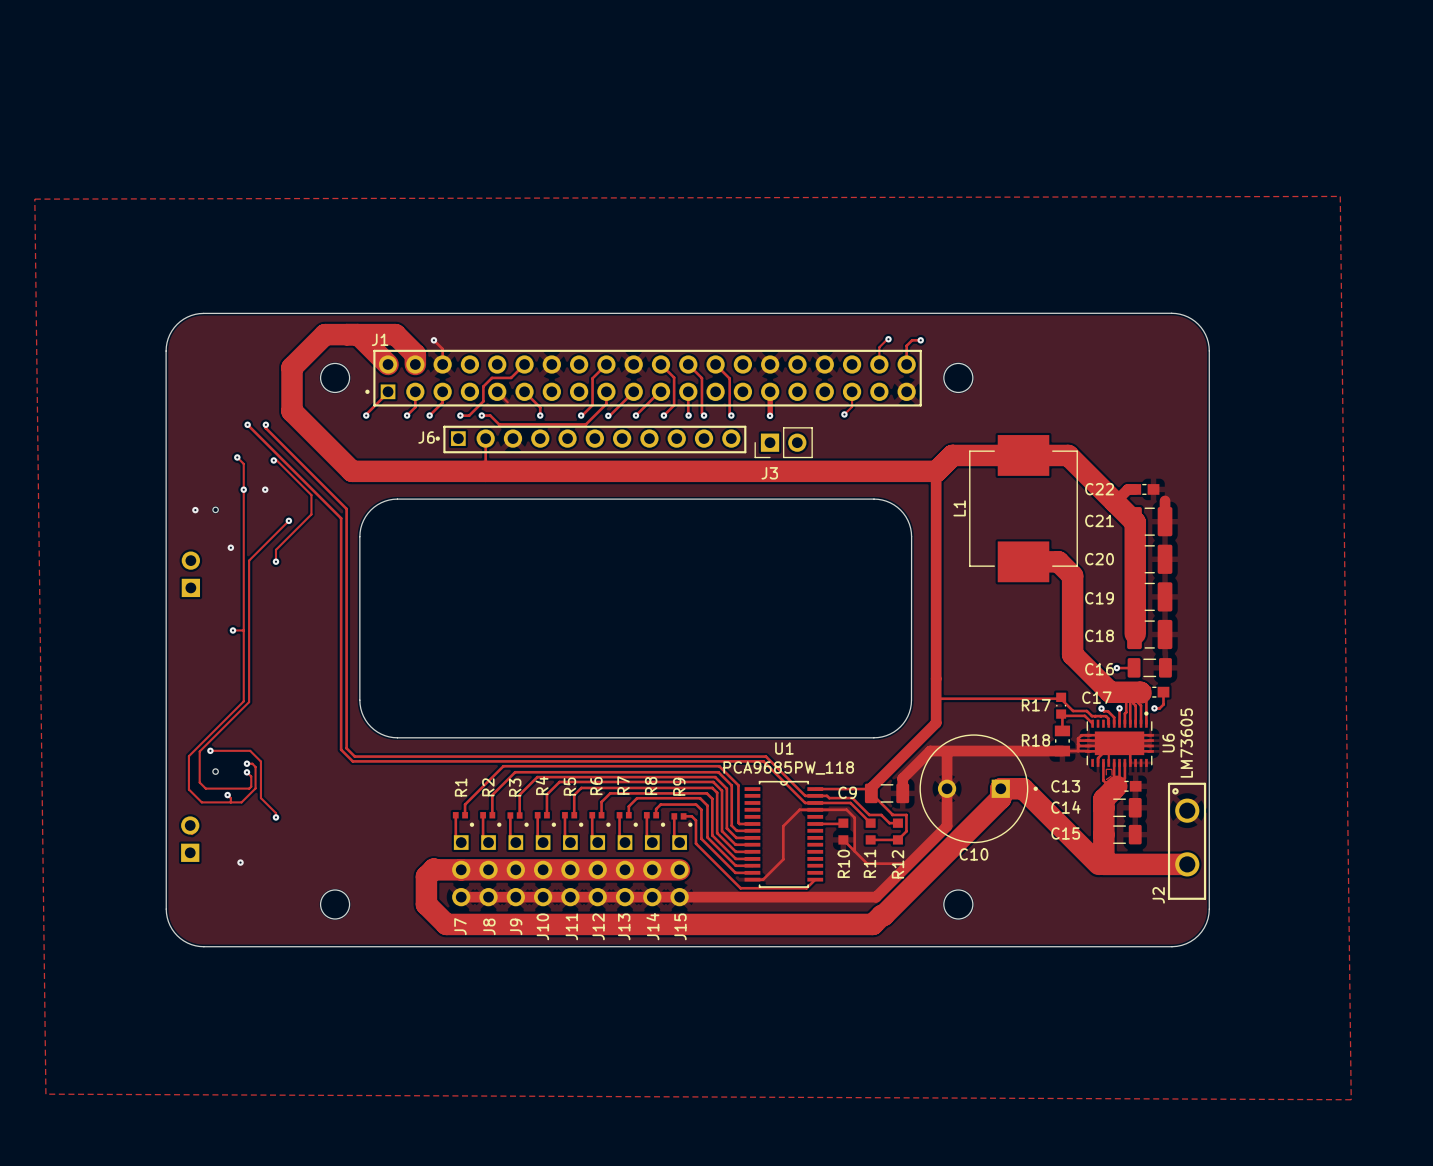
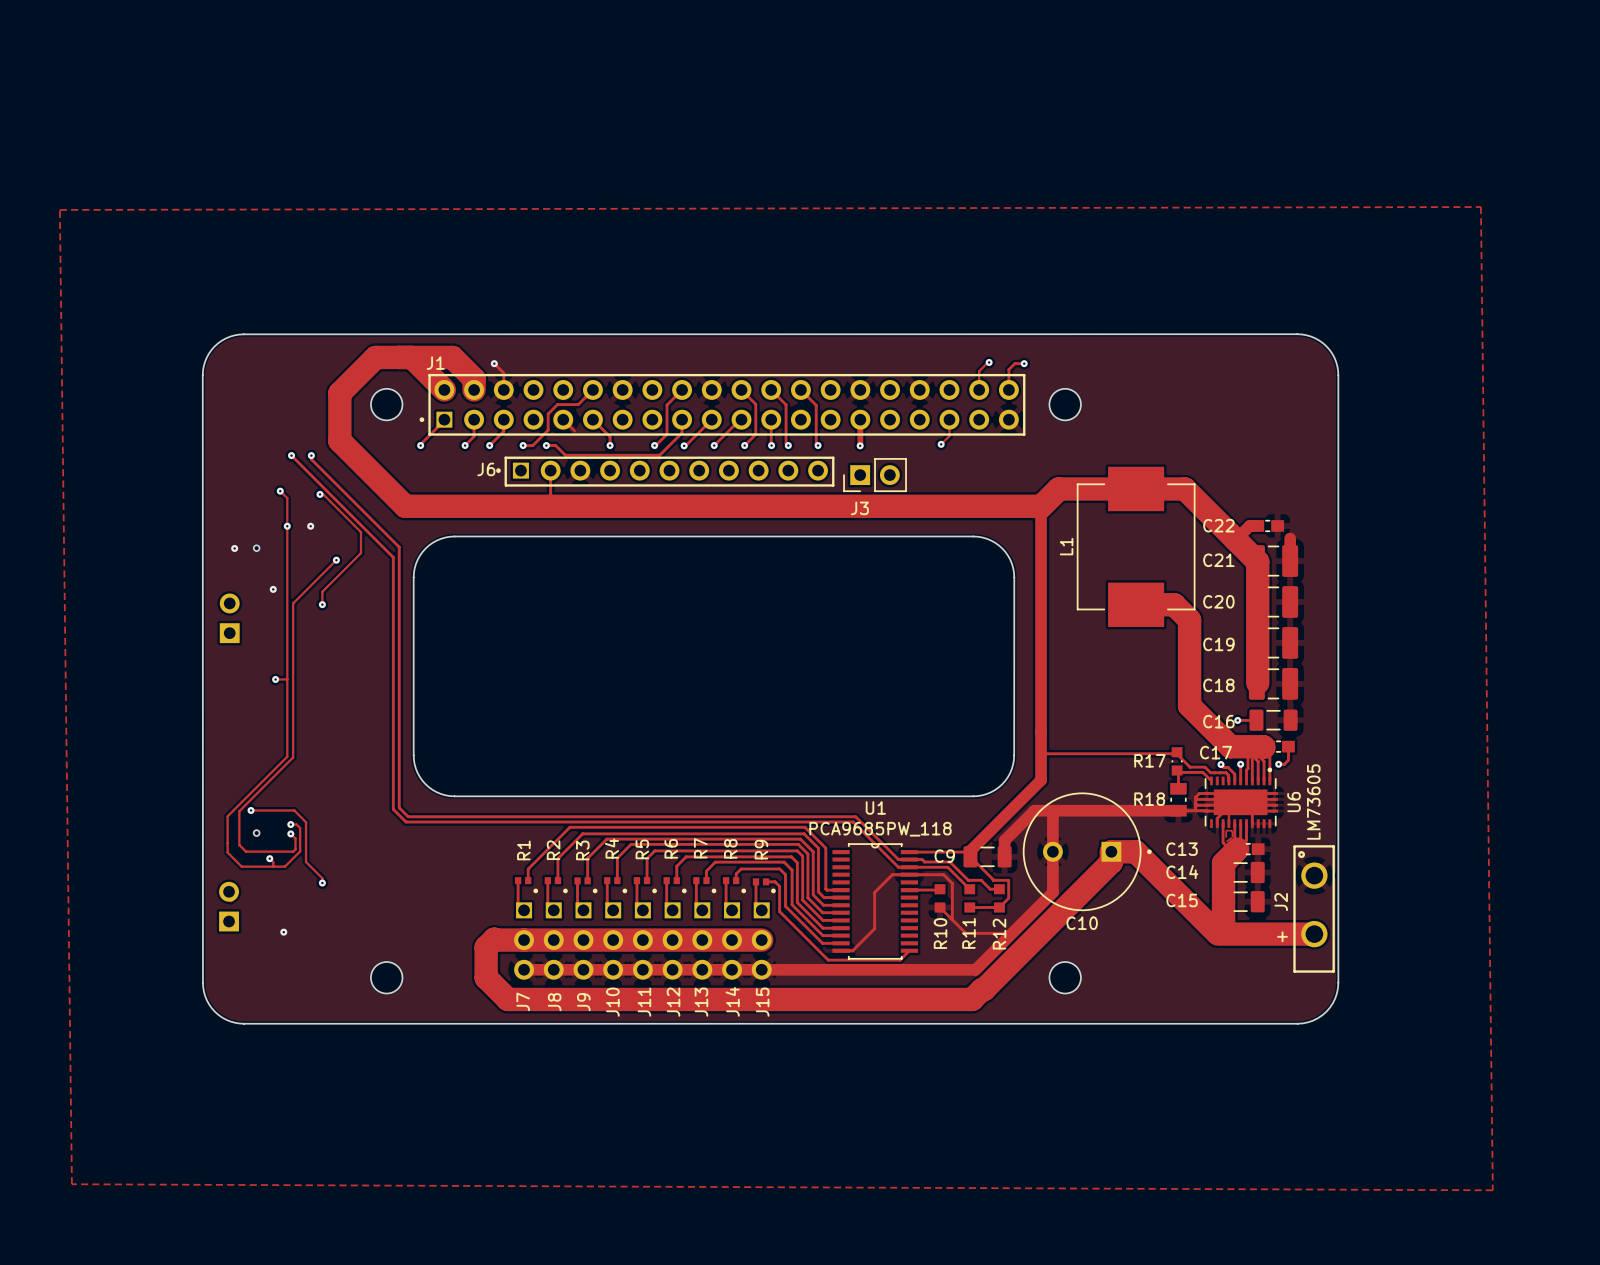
text: none -> + (1282, 936)
J2 name position: J2 (1158, 895) -> J2 (1281, 902)

